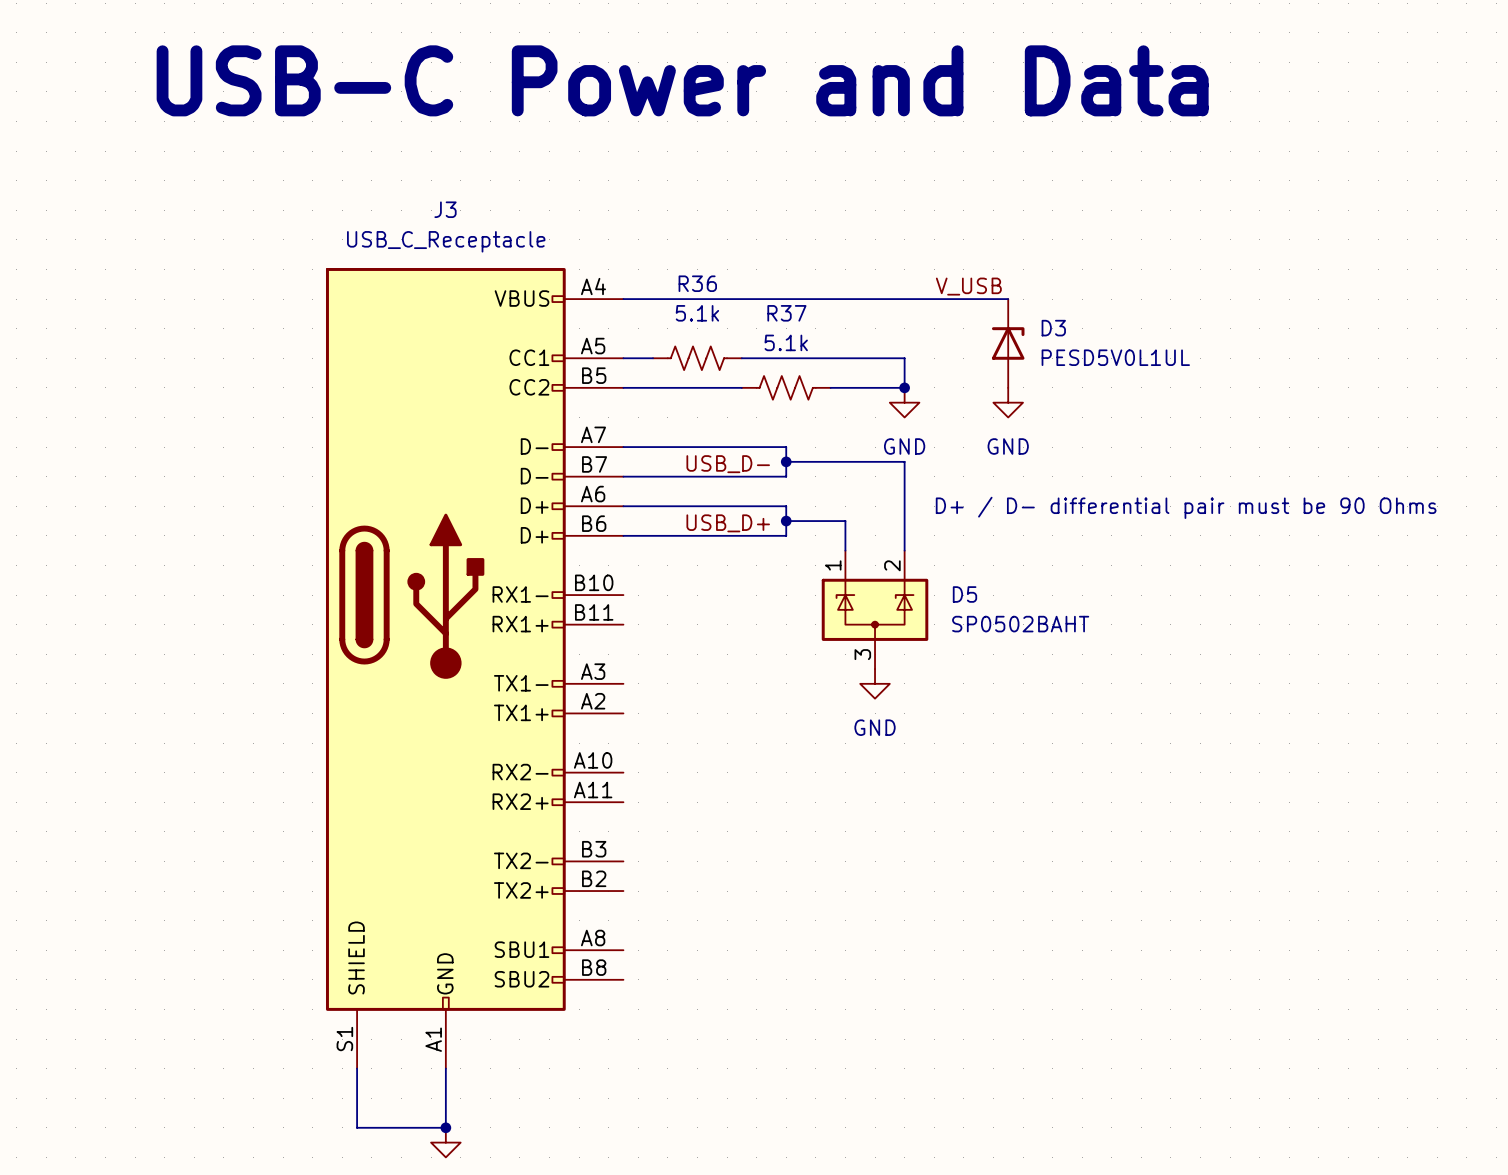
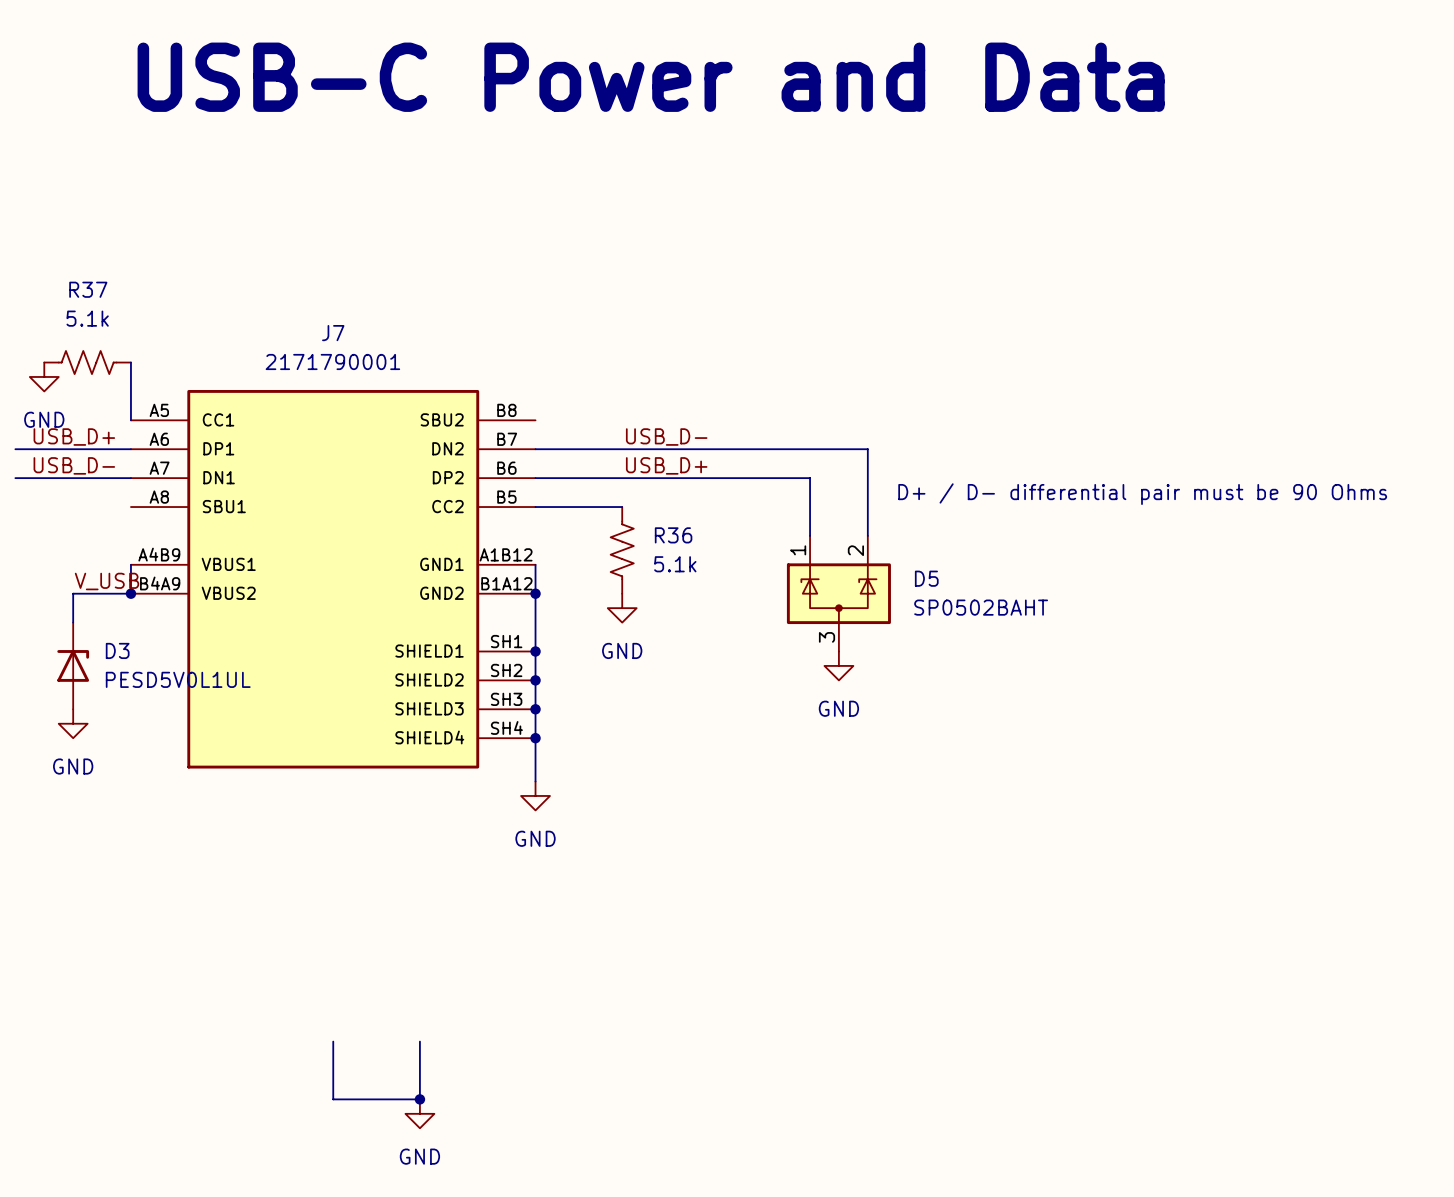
R36 name position: R36 (697, 283) -> R36 (673, 535)
label: V_USB (968, 286) -> none
wire: (623, 299) (1008, 299) -> none
D3 position: (1008, 343) -> (73, 665)
wire: (623, 358) (653, 358) -> none
R36 rotation: 0° (697, 358) -> 90° clockwise (622, 550)
R36 position: (697, 358) -> (622, 550)
wire: (741, 358) (904, 358) (904, 387) (830, 387) -> none
wire: none -> (130, 362) (130, 420)
power symbol: none -> GND (44, 376)
wire: (623, 387) (741, 387) -> none
R37 position: (786, 387) -> (87, 362)
junction: (904, 387) -> none
power symbol: GND (904, 402) -> none
power symbol: GND (1008, 402) -> none
wire: (623, 447) (786, 447) (786, 476) (623, 476) -> none
label: none -> USB_D+ (74, 437)
wire: none -> (15, 449) (130, 449)
wire: none -> (535, 449) (752, 449)
junction: (786, 461) -> none
label position: USB_D- (728, 464) -> USB_D- (666, 437)
label: none -> USB_D- (74, 465)
wire: none -> (15, 478) (130, 478)
wire: (623, 506) (786, 506) (786, 535) (623, 535) -> none
wire: none -> (535, 507) (622, 507)
wire: (786, 521) (845, 521) -> (535, 478) (810, 478) (810, 507)
junction: (786, 521) -> none
label position: USB_D+ (728, 523) -> USB_D+ (666, 465)
wire: none -> (130, 564) (130, 593) (73, 593) (73, 622)
J7: none -> 2171790001 (333, 579)
label: none -> V_USB (107, 581)
junction: none -> (130, 593)
junction: none -> (535, 593)
power symbol: none -> GND (622, 608)
J3: USB_C_Receptacle (474, 668) -> none
junction: none -> (535, 651)
junction: none -> (535, 680)
junction: none -> (535, 709)
power symbol: none -> GND (73, 723)
junction: none -> (535, 738)
power symbol: none -> GND (535, 795)

